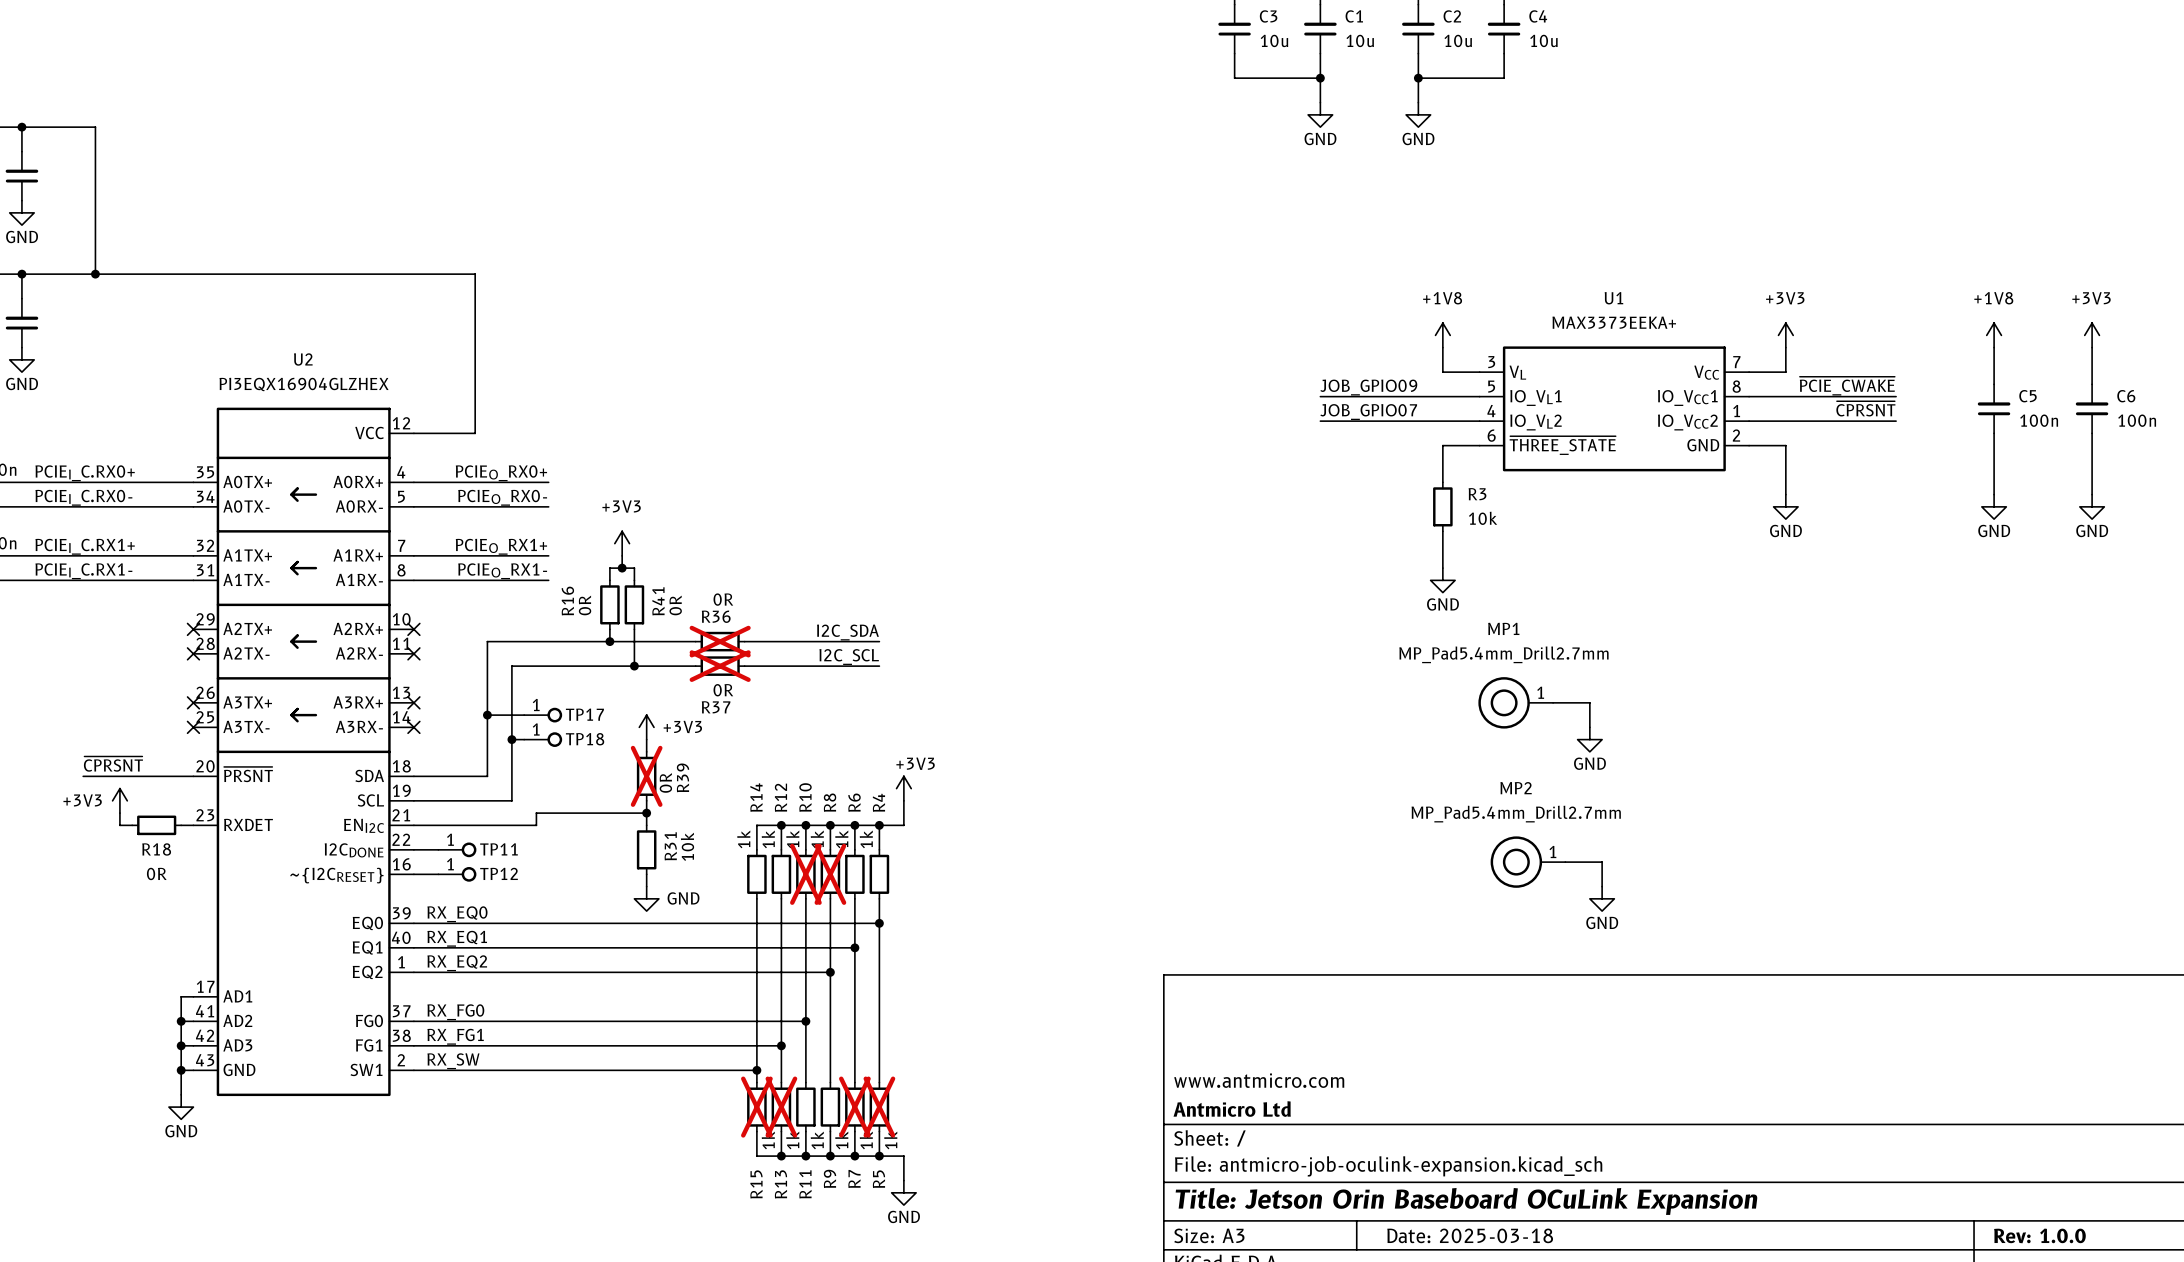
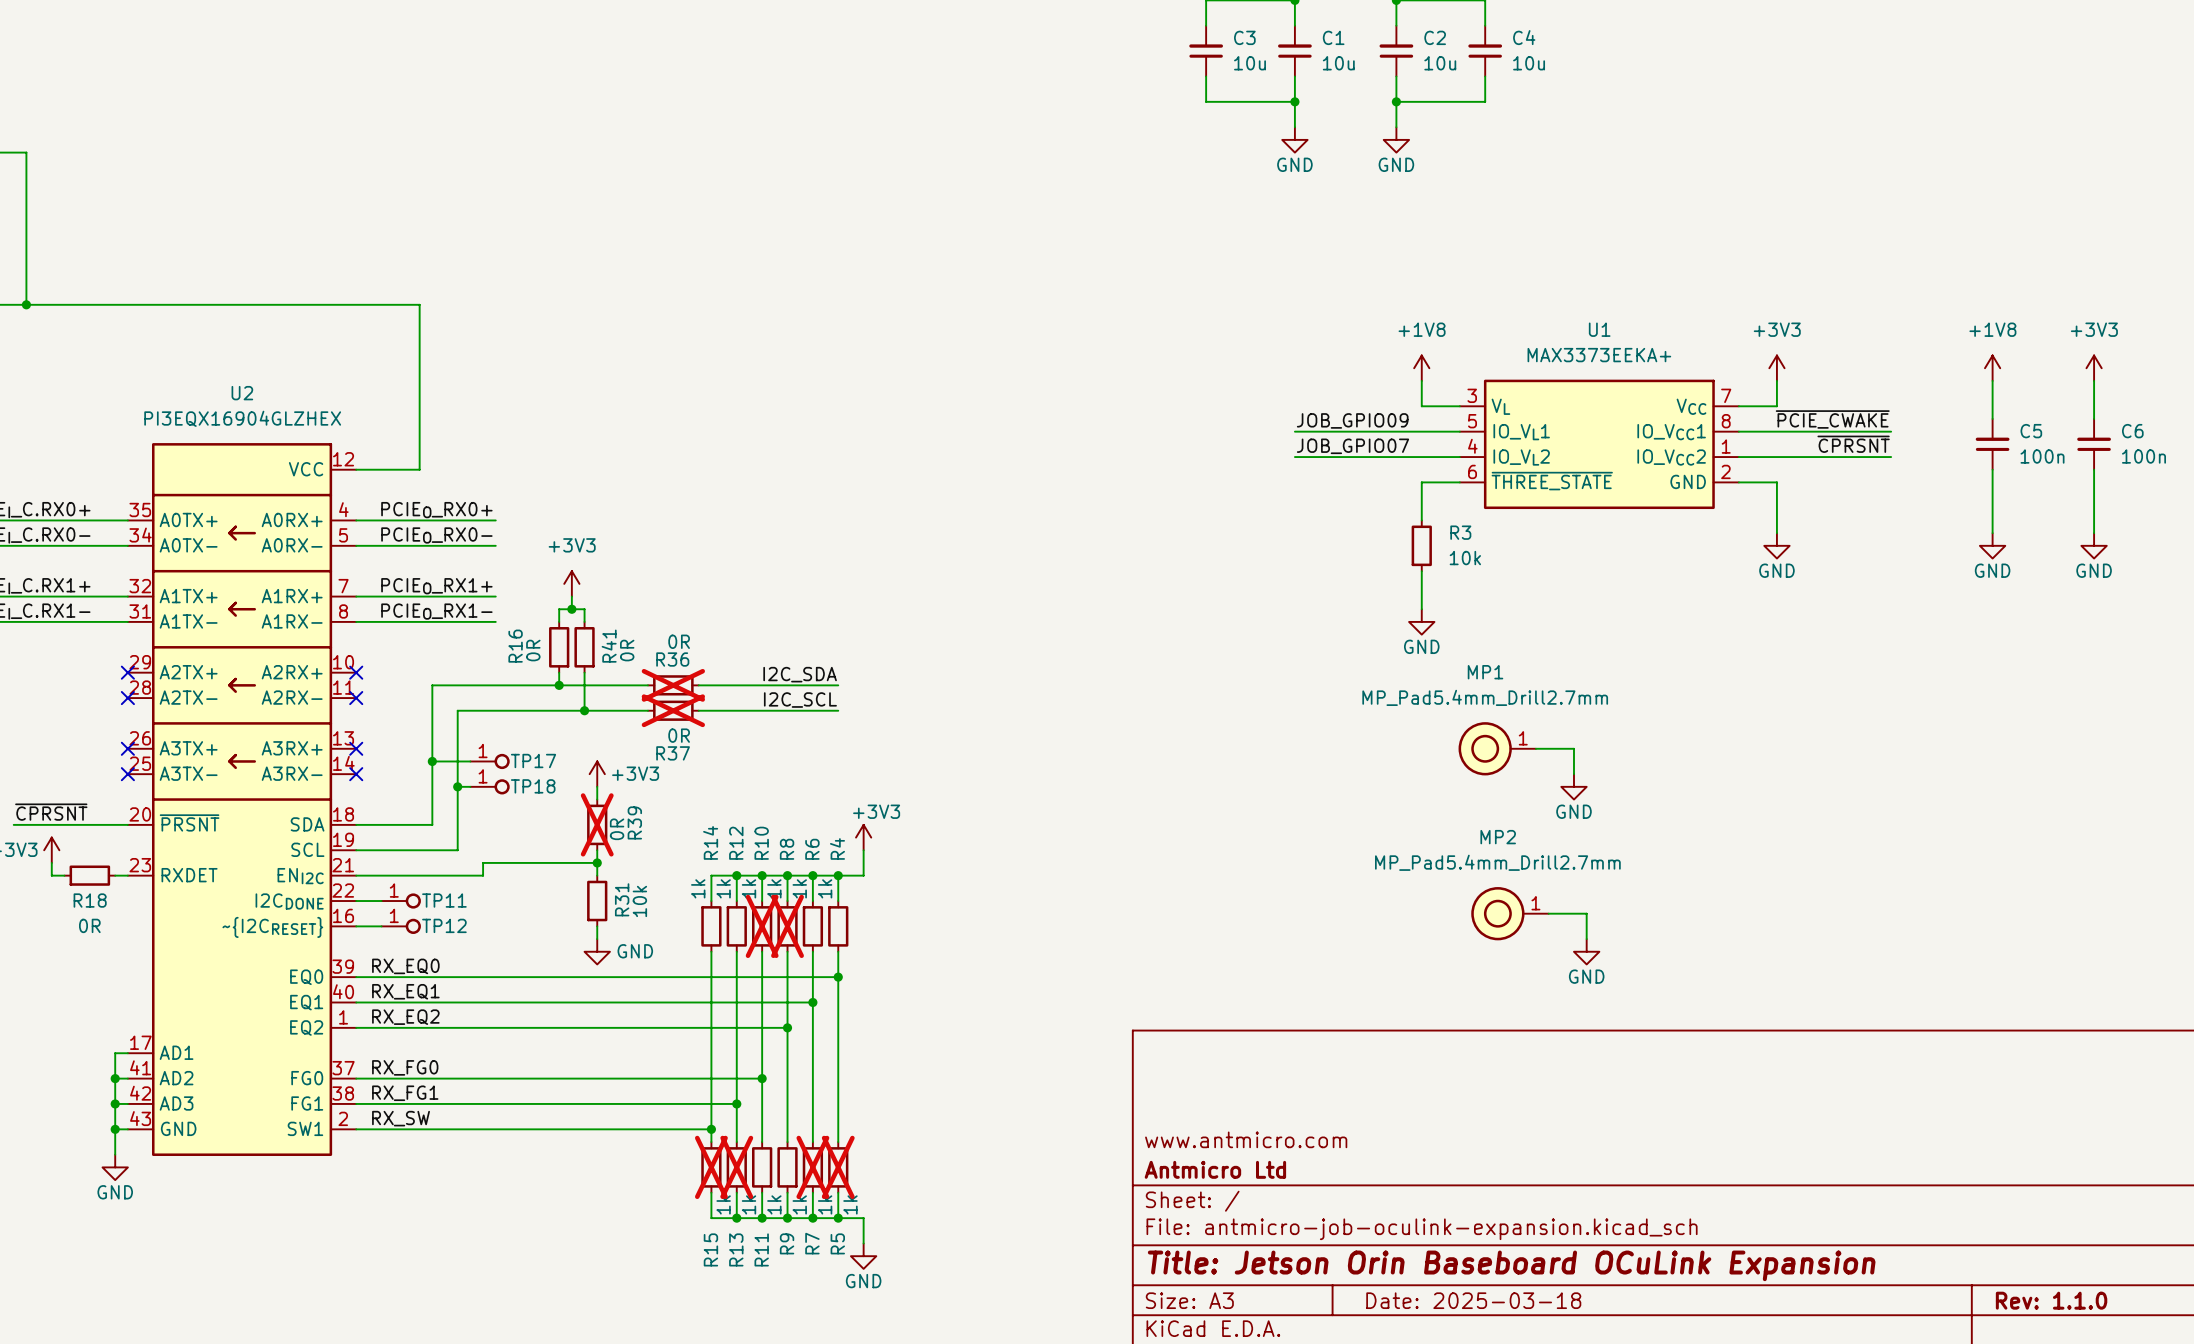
title block: Rev: 1.0.0 (2039, 1235) -> Rev: 1.1.0 (2051, 1300)

